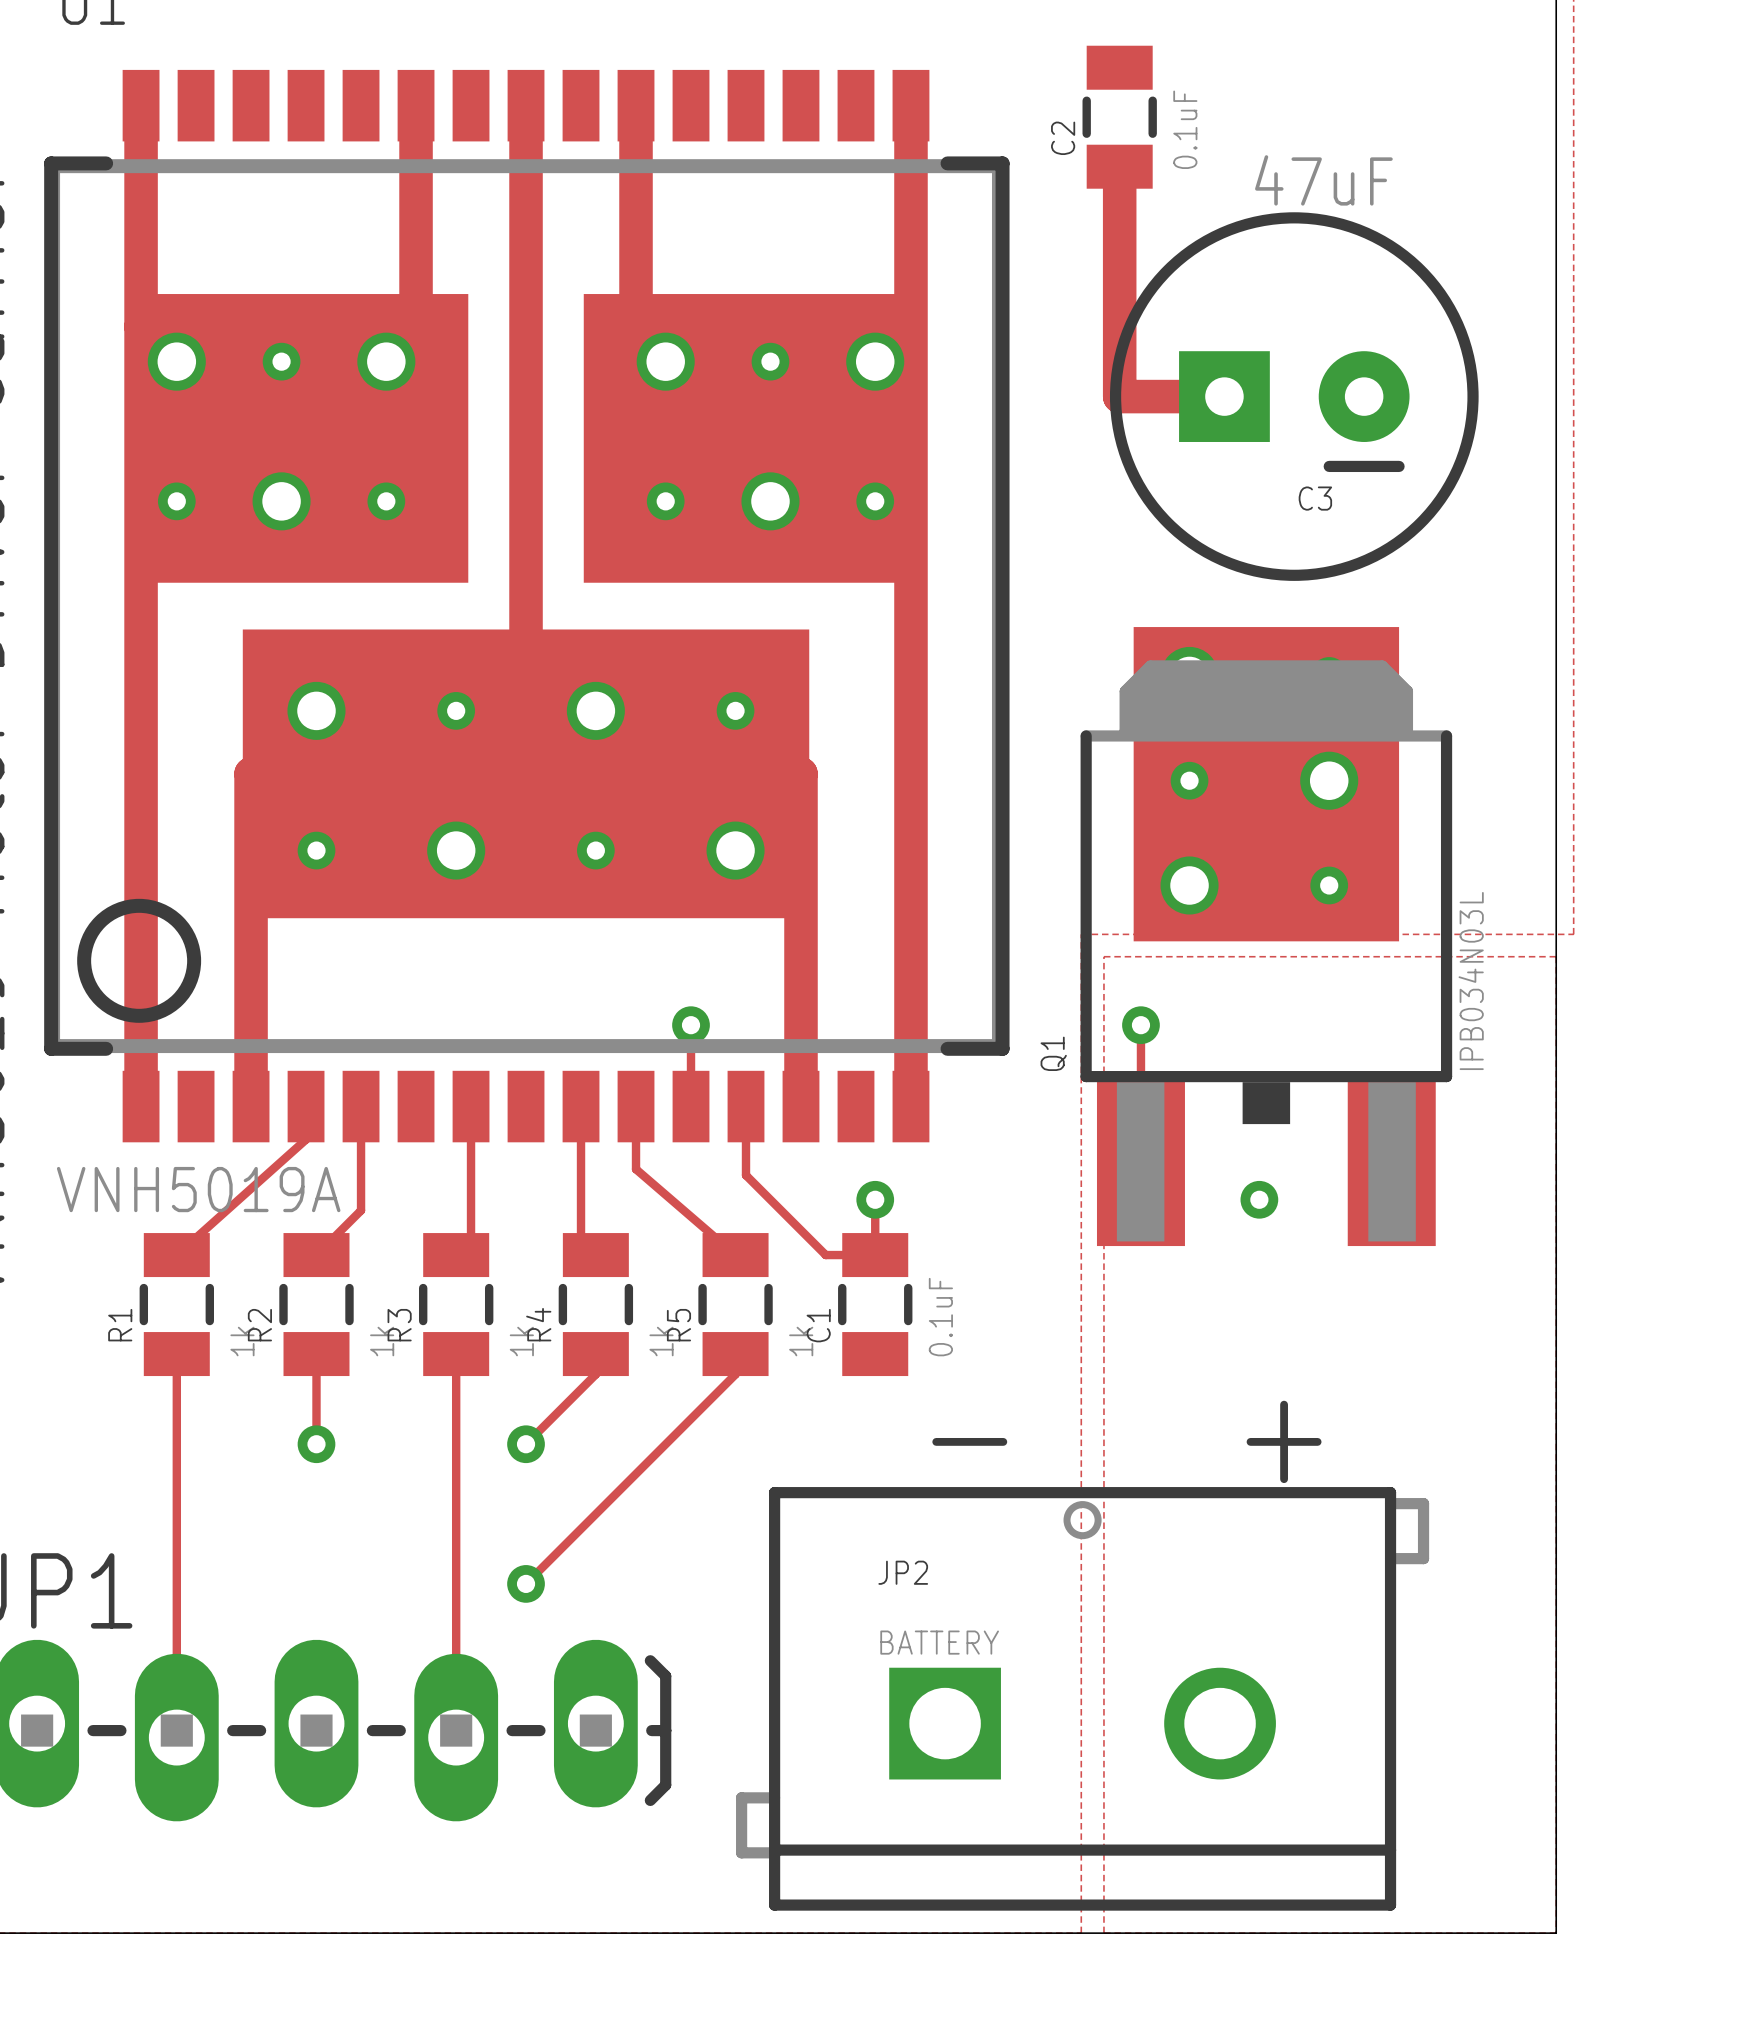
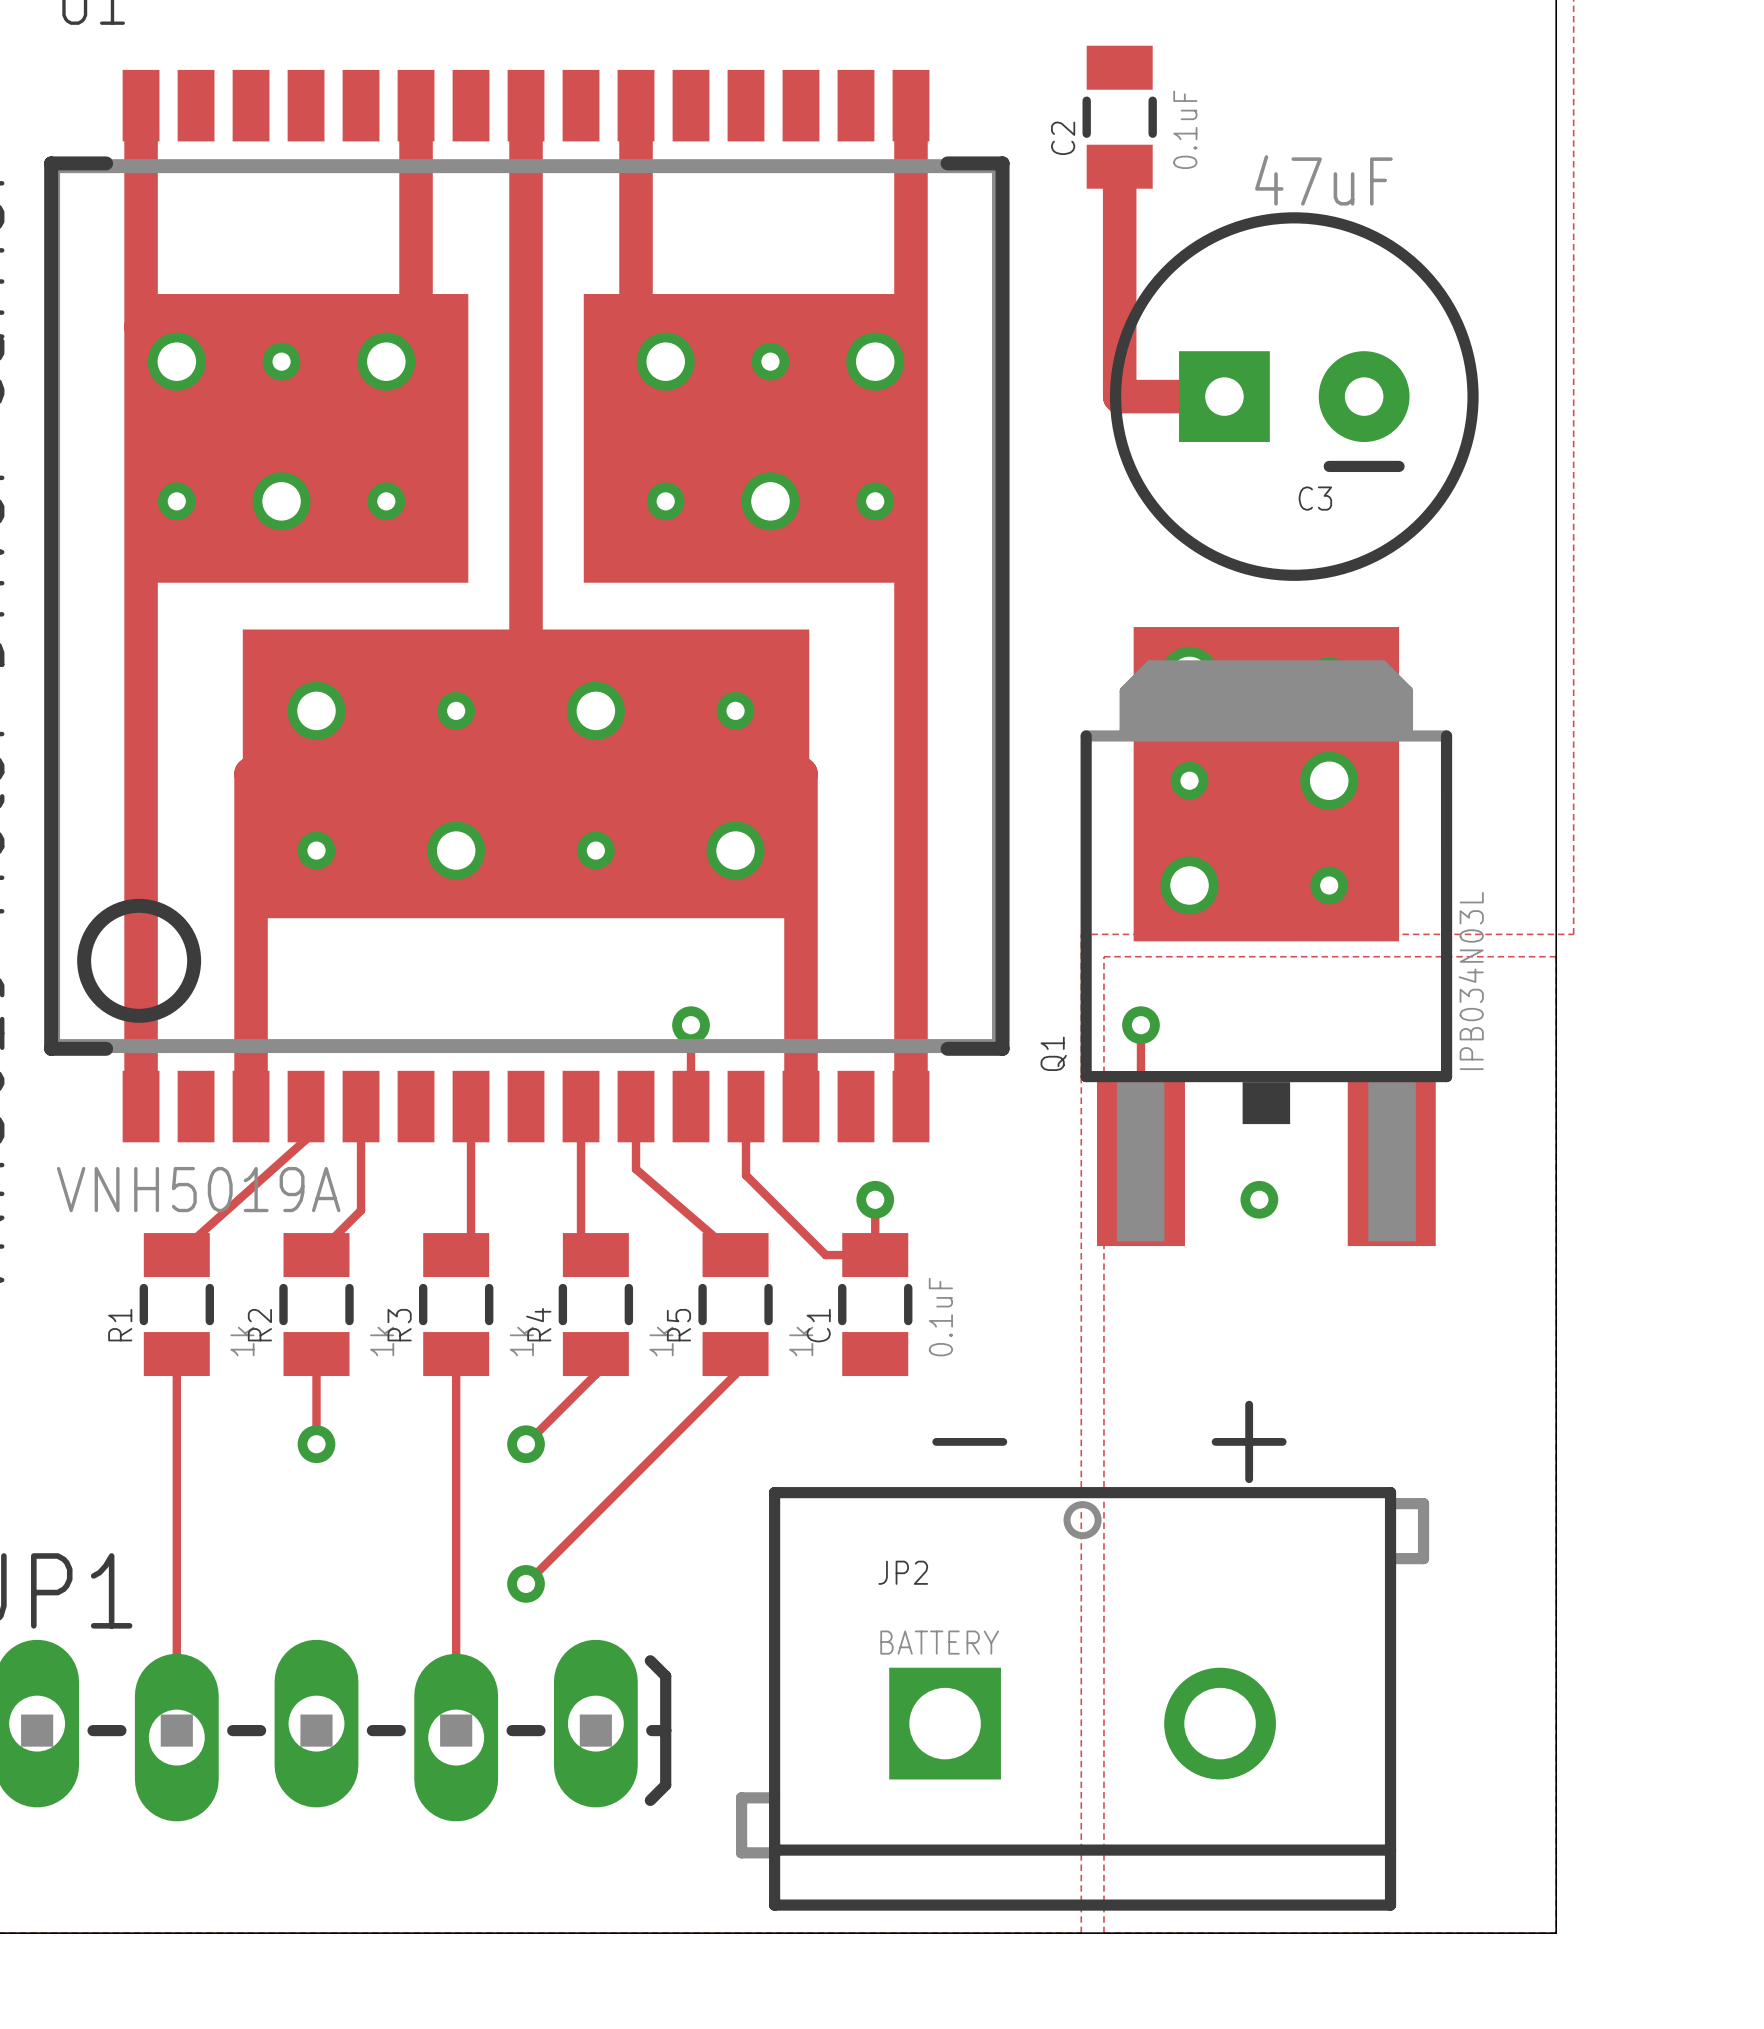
text position: + (1284, 1441) -> + (1249, 1441)

